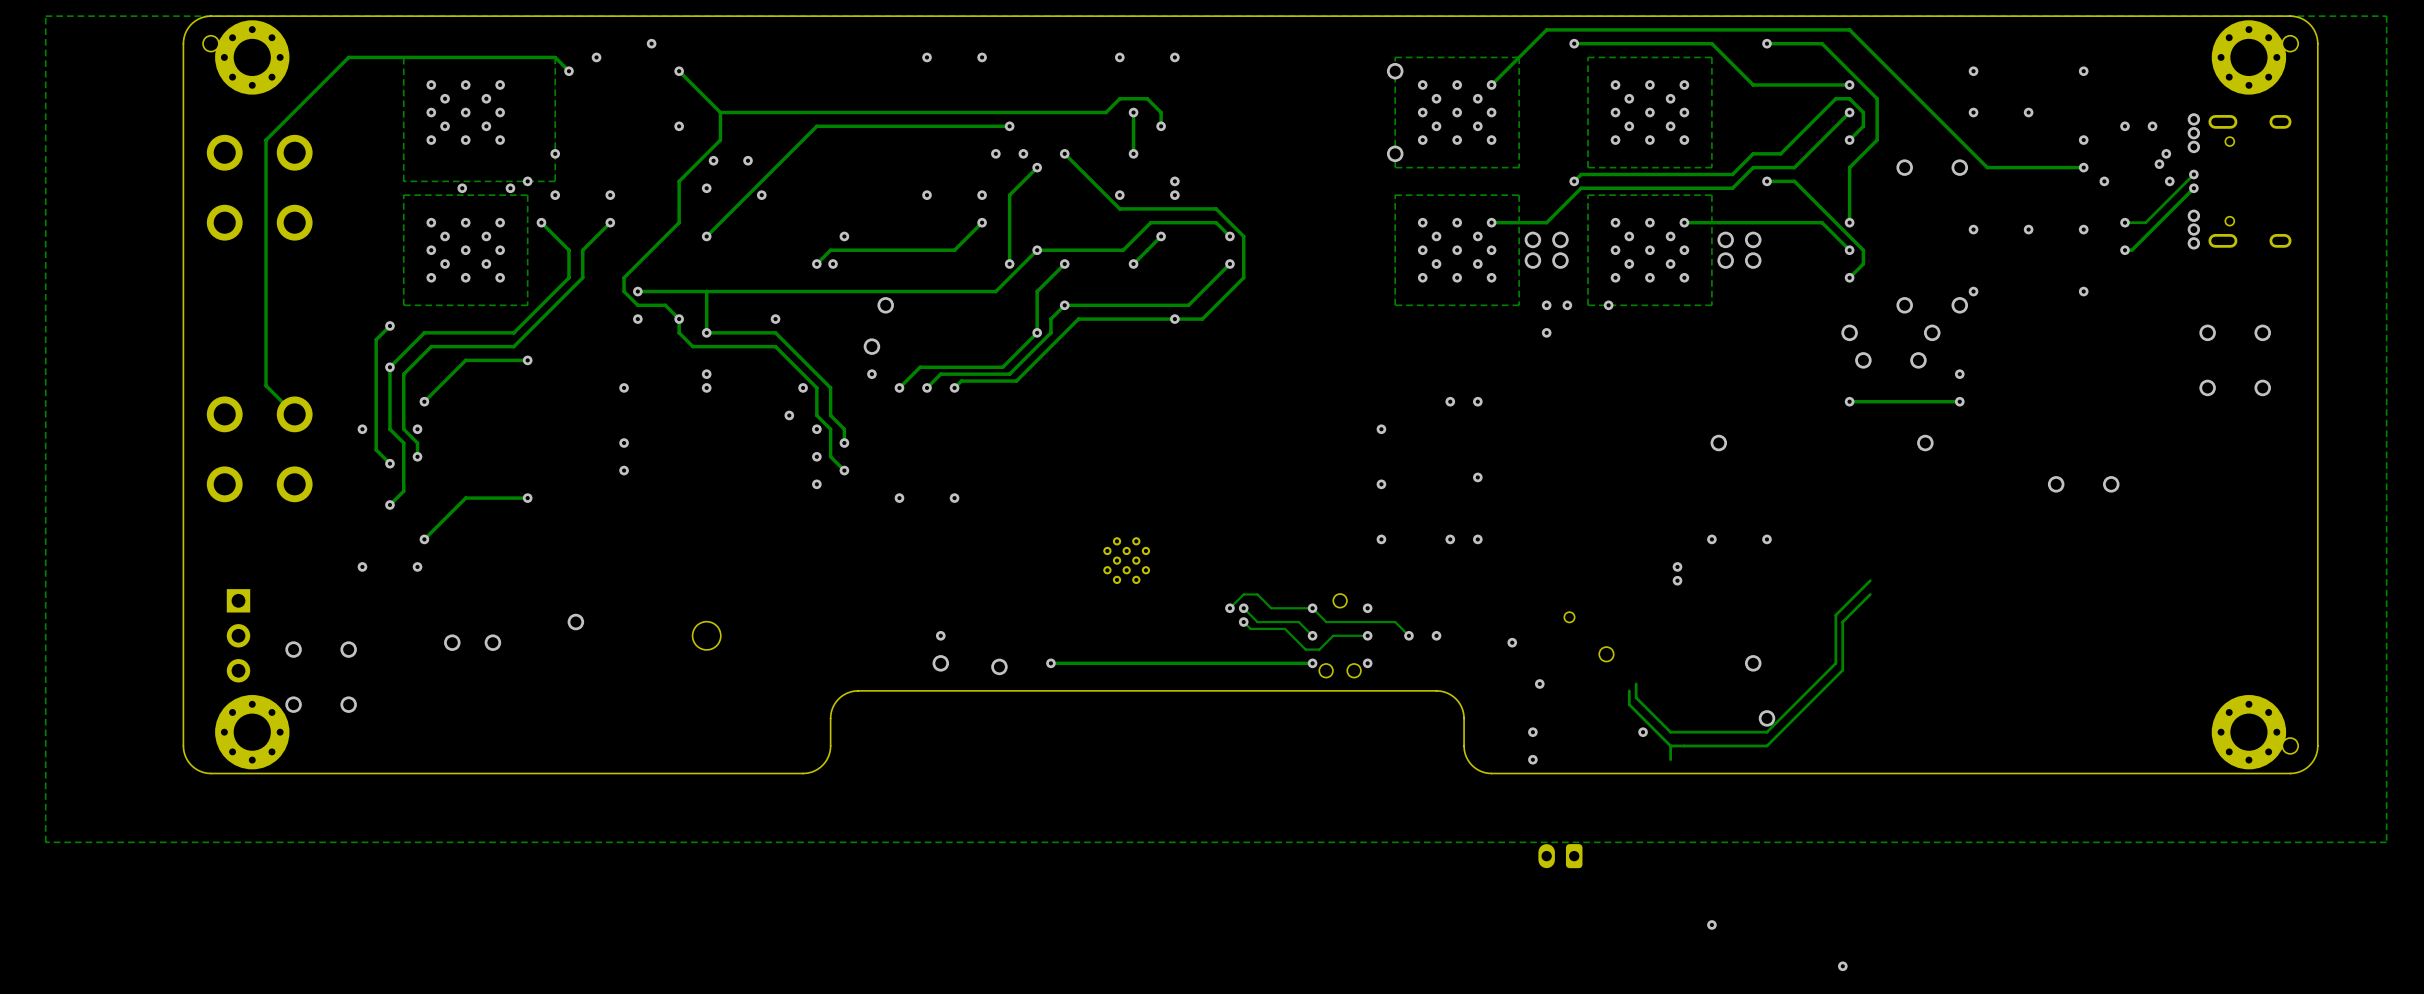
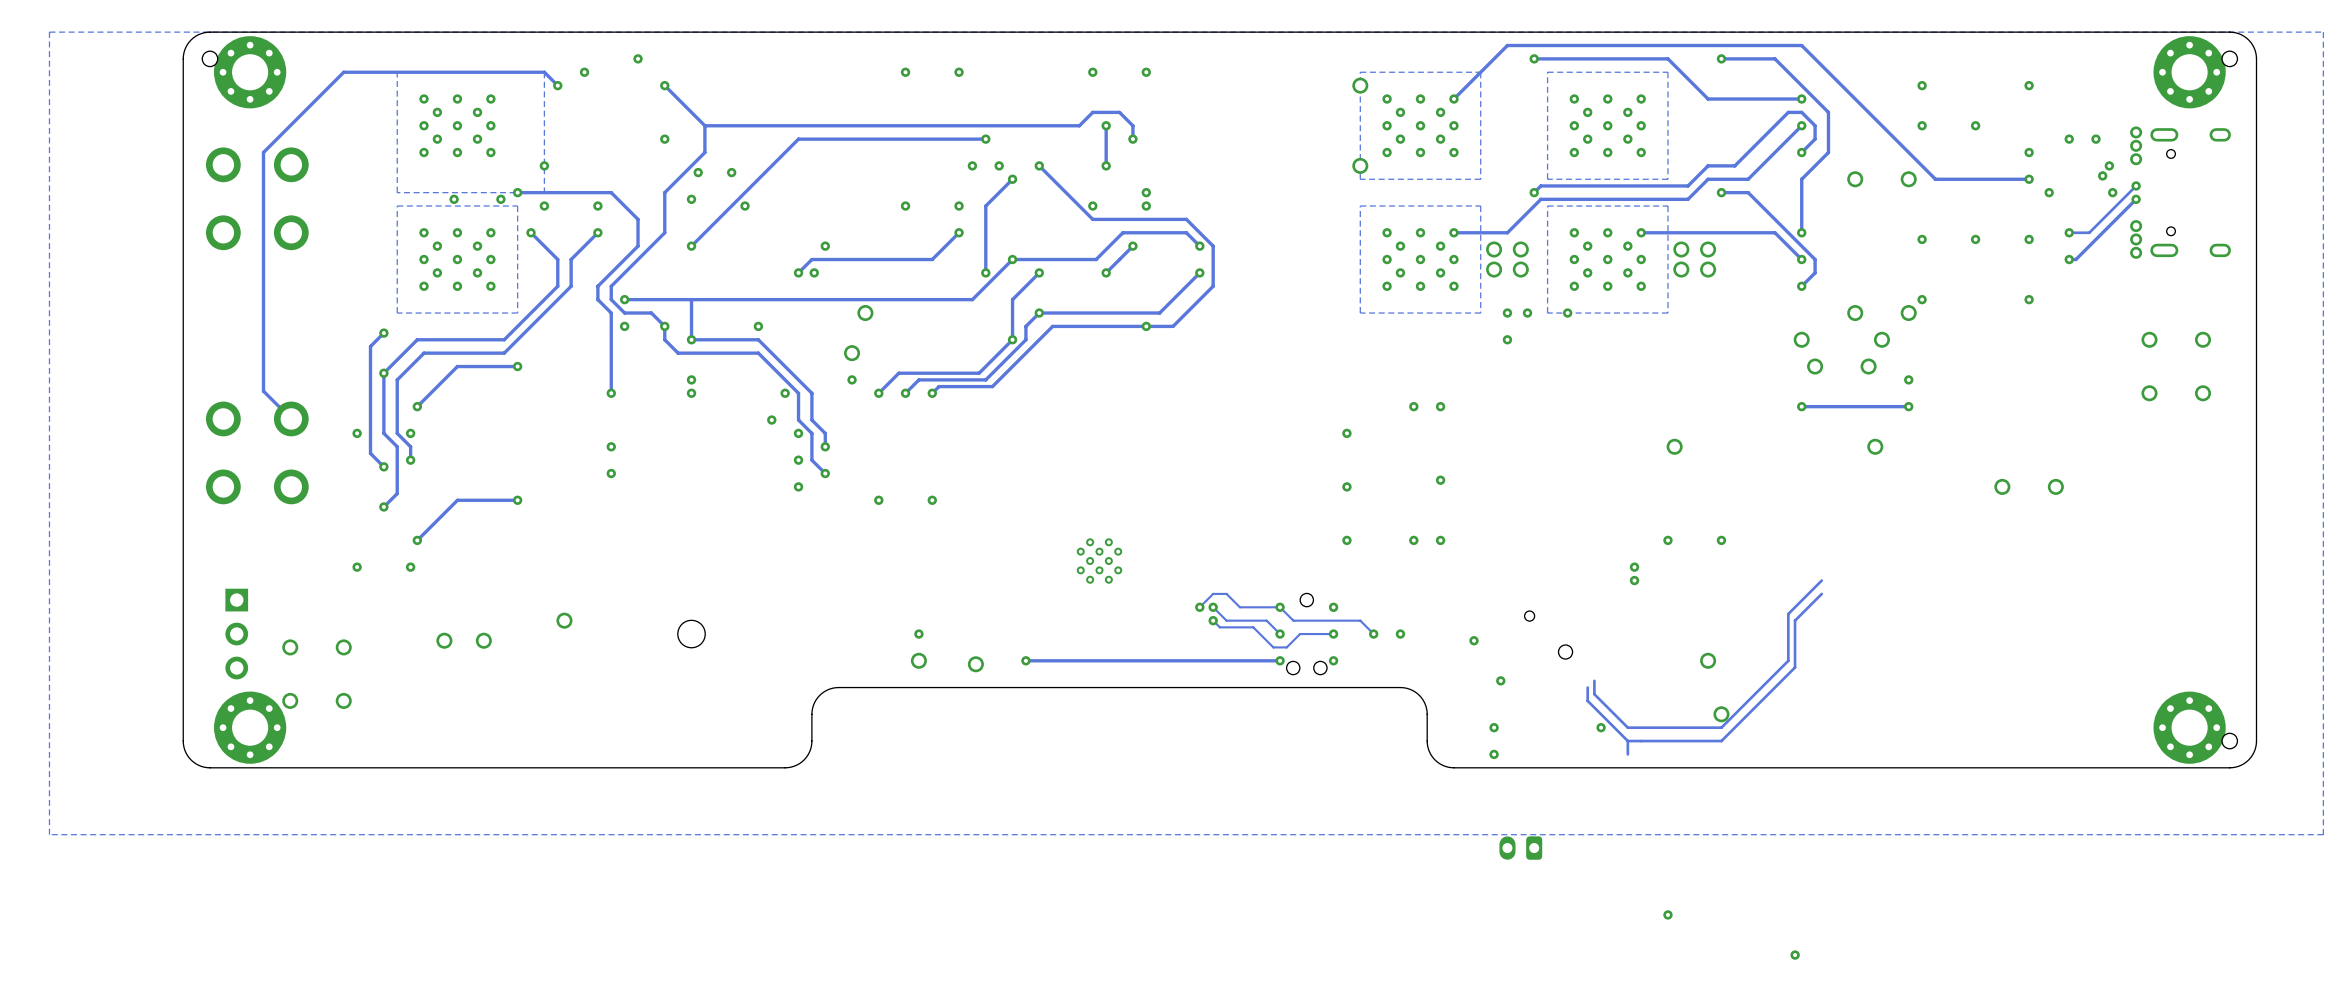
track: none -> (517, 192) (611, 192) (638, 219) (638, 246) (597, 286) (597, 299) (611, 313) (611, 393)

